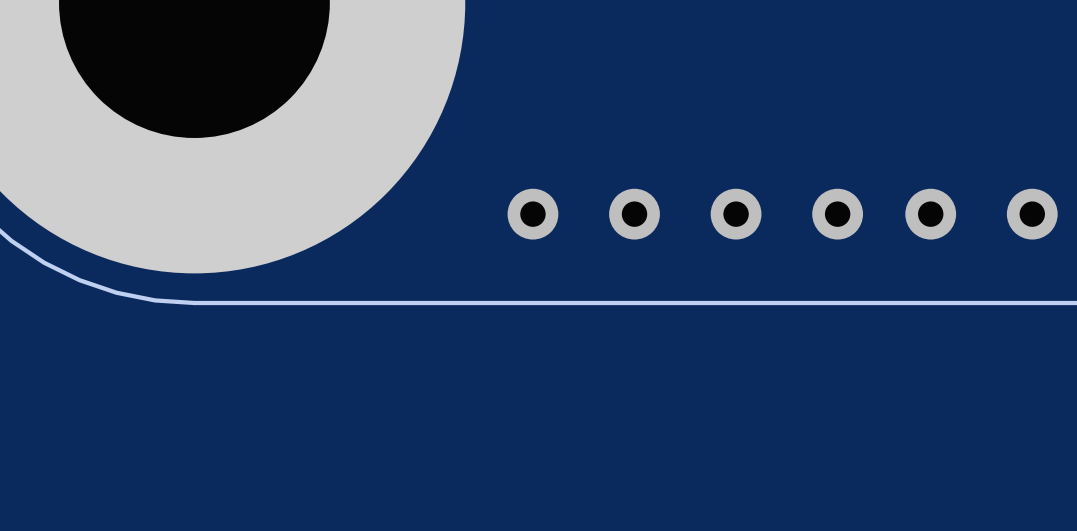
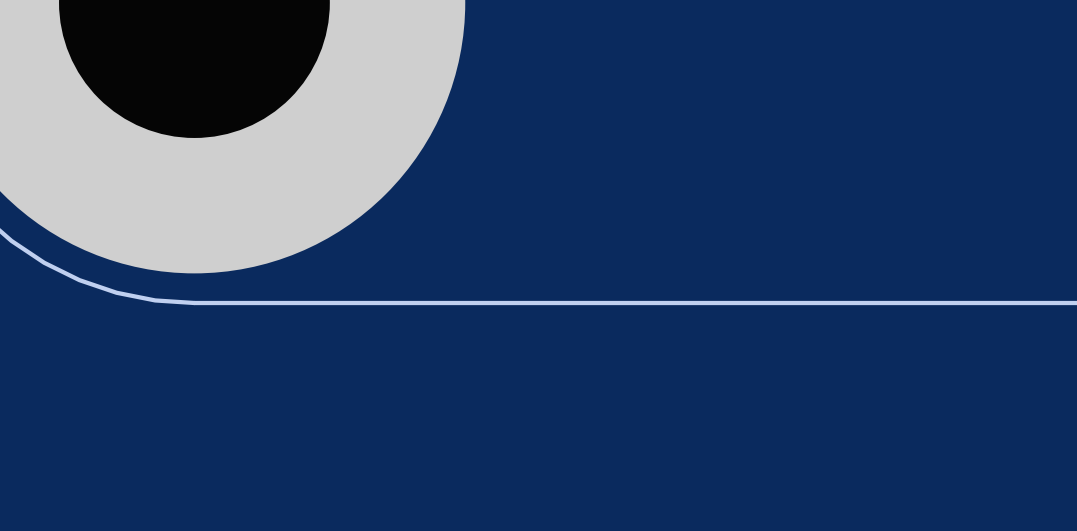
via: (532, 214) -> none
via: (634, 214) -> none
via: (736, 214) -> none
via: (837, 214) -> none
via: (930, 214) -> none
via: (1032, 214) -> none

